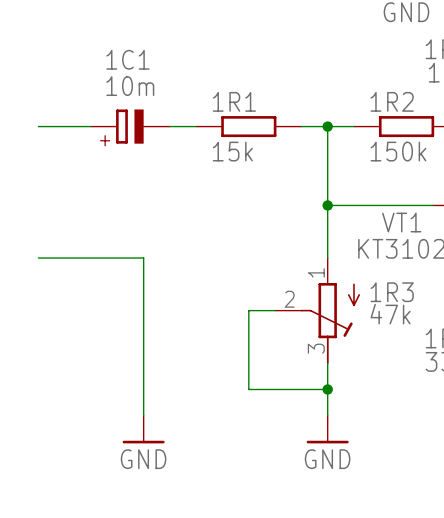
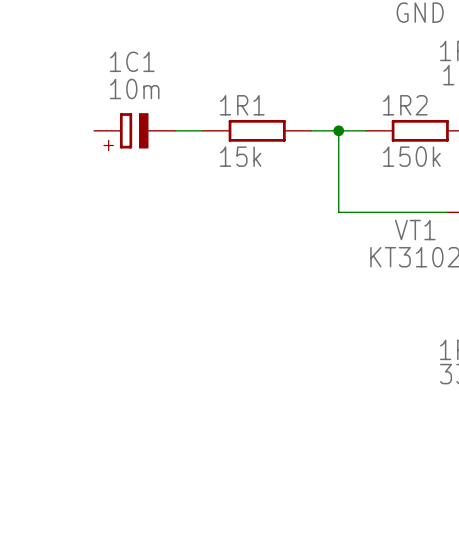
wire: (38, 126) (91, 126) -> none
wire: (327, 205) (327, 258) -> none
junction: (327, 205) -> none
wire: (38, 258) (143, 258) (143, 415) -> none
wire: (275, 310) (248, 310) (248, 389) (327, 389) -> none
1R3: 47k (317, 311) -> none
wire: (327, 363) (327, 415) -> none
junction: (327, 389) -> none
power symbol: GND (143, 429) -> none
power symbol: GND (327, 429) -> none

